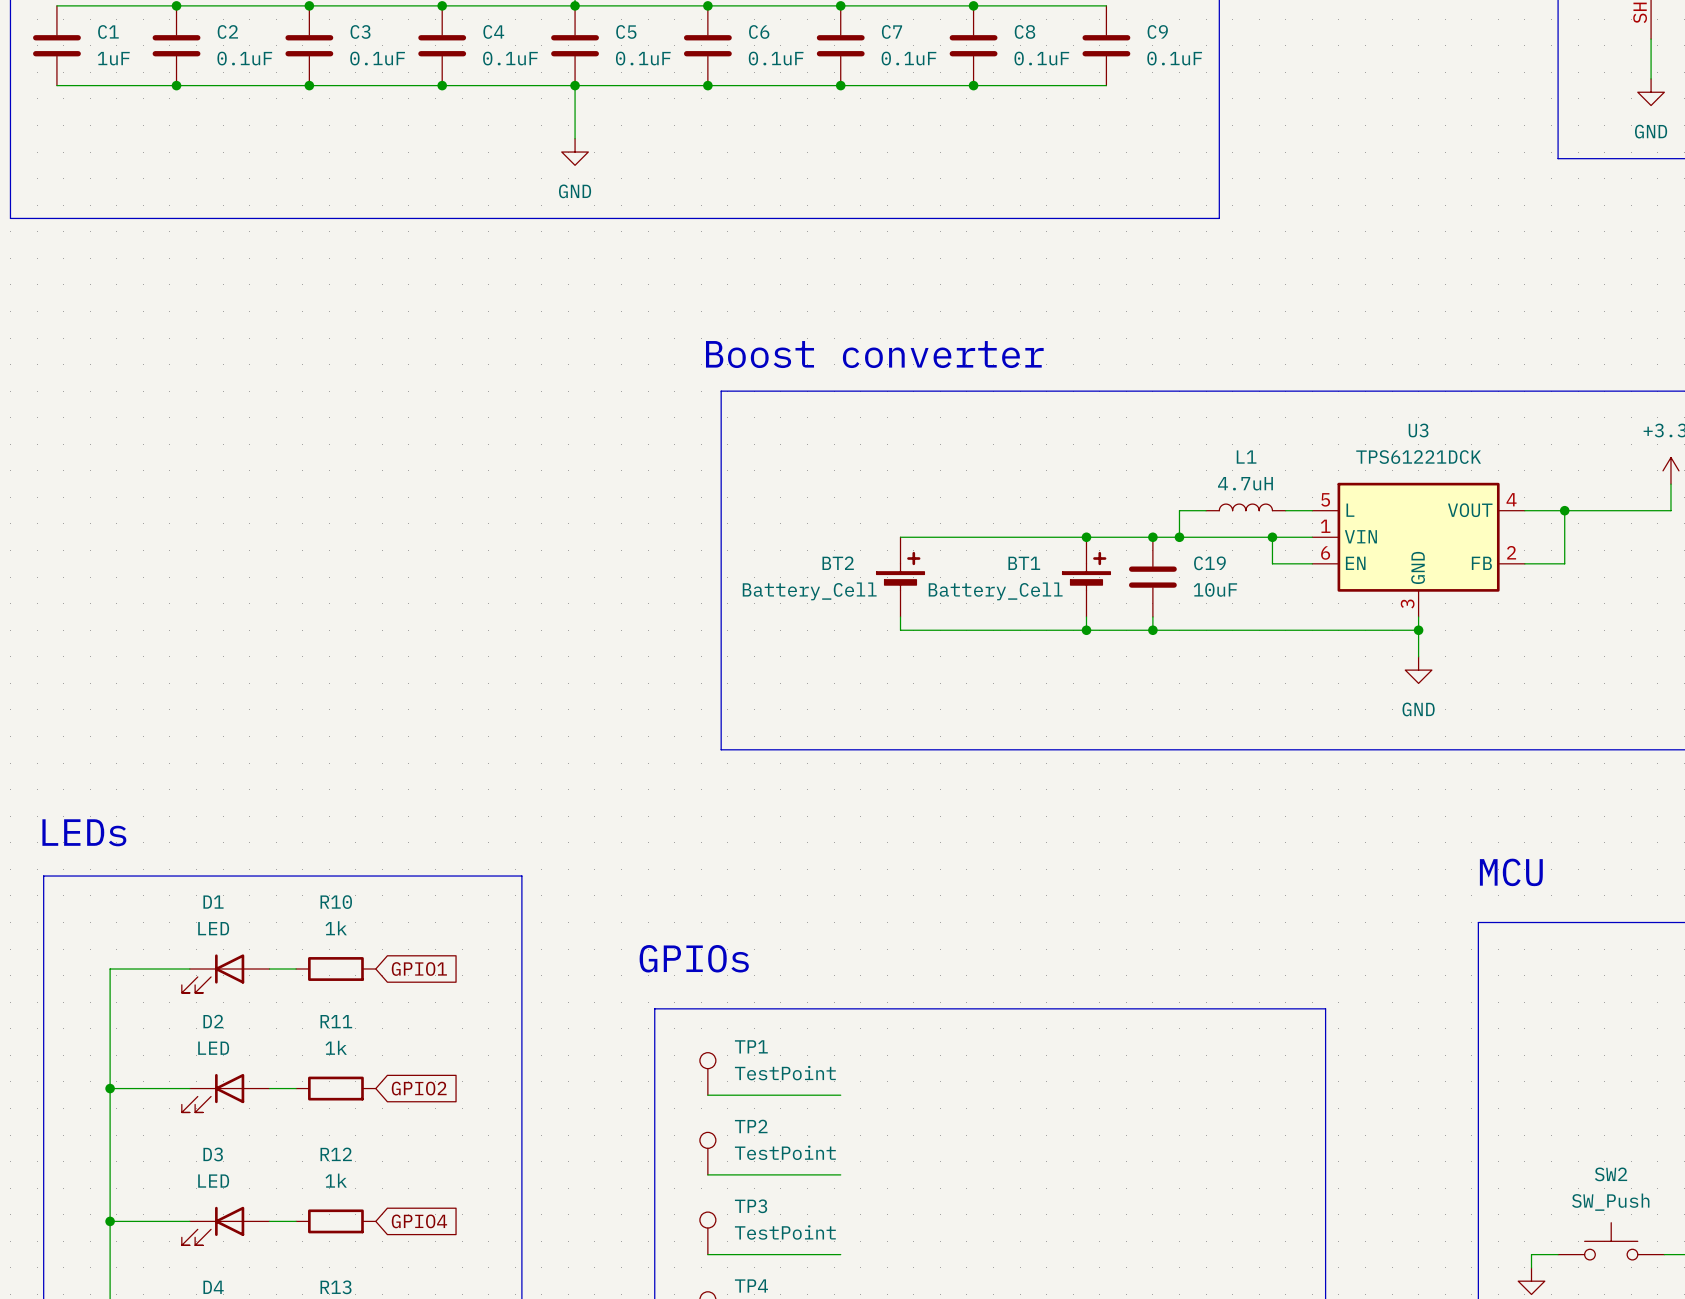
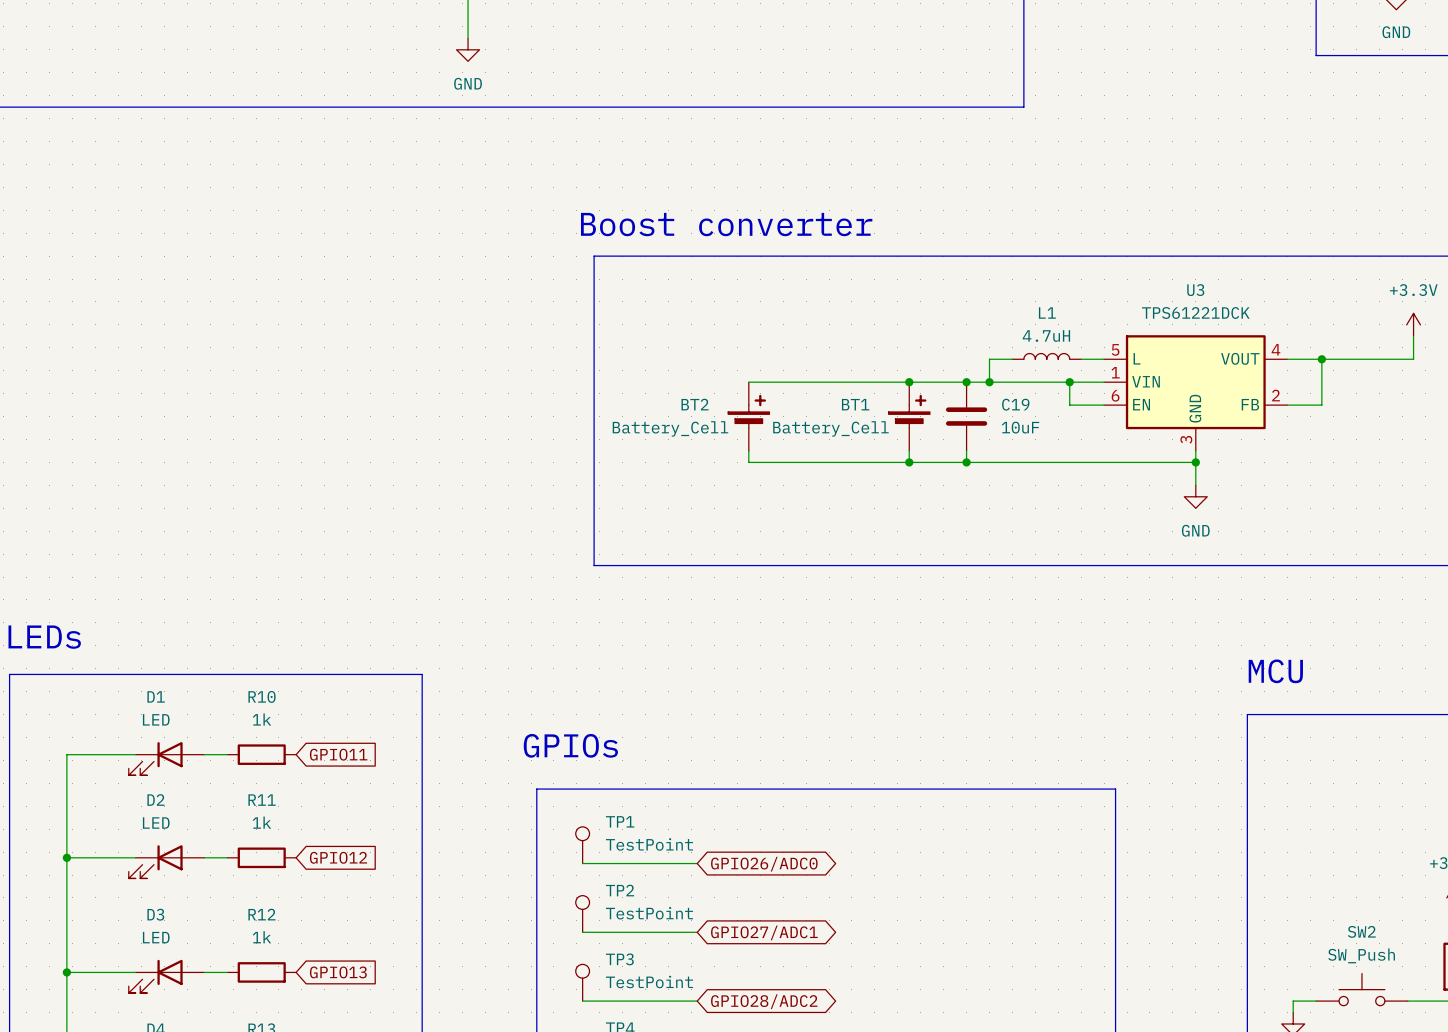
global label: GPIO1 (419, 969) -> GPIO11 (338, 754)
global label: GPIO2 (419, 1088) -> GPIO12 (338, 857)
global label: none -> GPIO26/ADC0 (764, 864)
global label: none -> GPIO27/ADC1 (764, 932)
global label: GPIO4 (419, 1221) -> GPIO13 (338, 972)
global label: none -> GPIO28/ADC2 (764, 1001)

